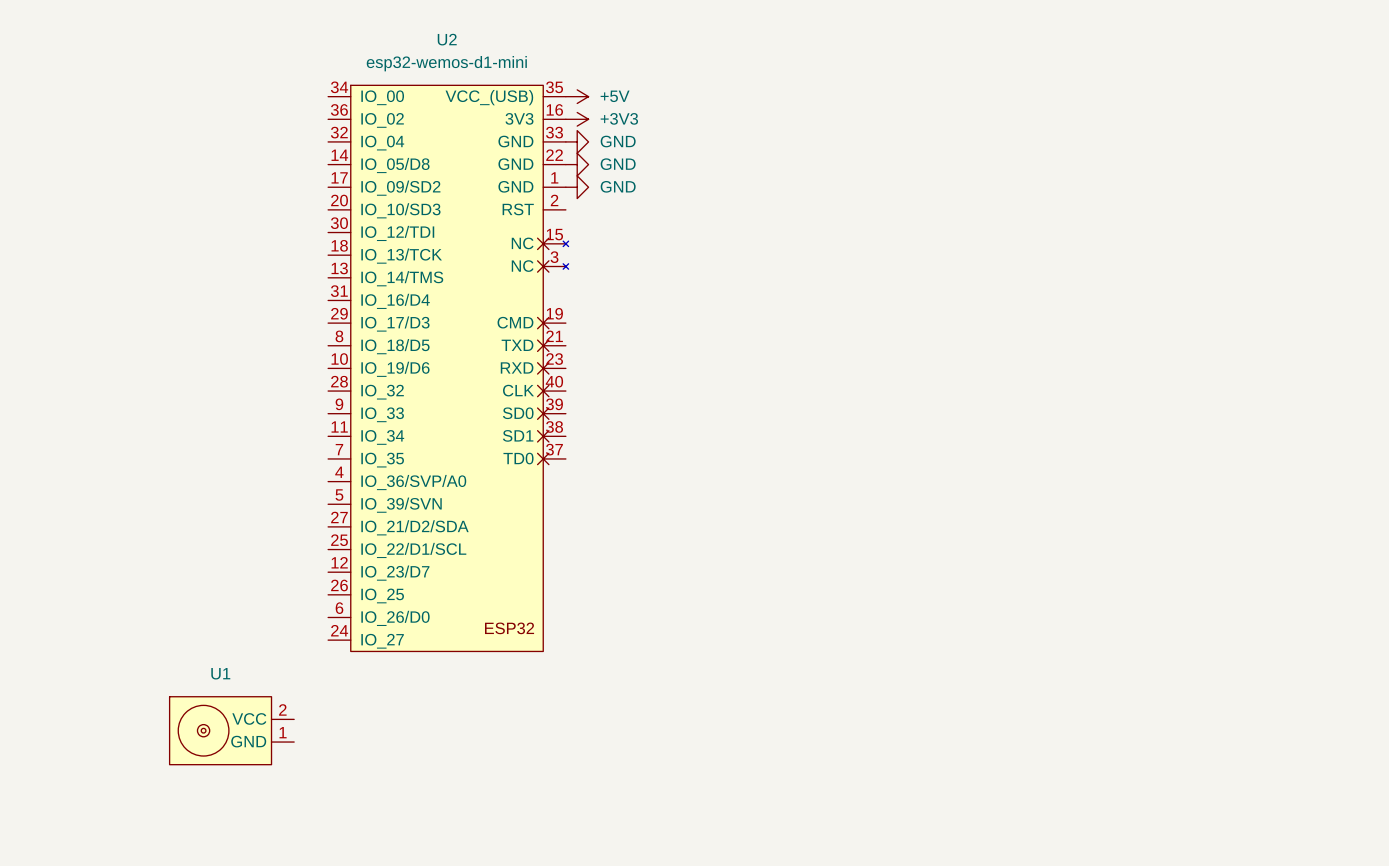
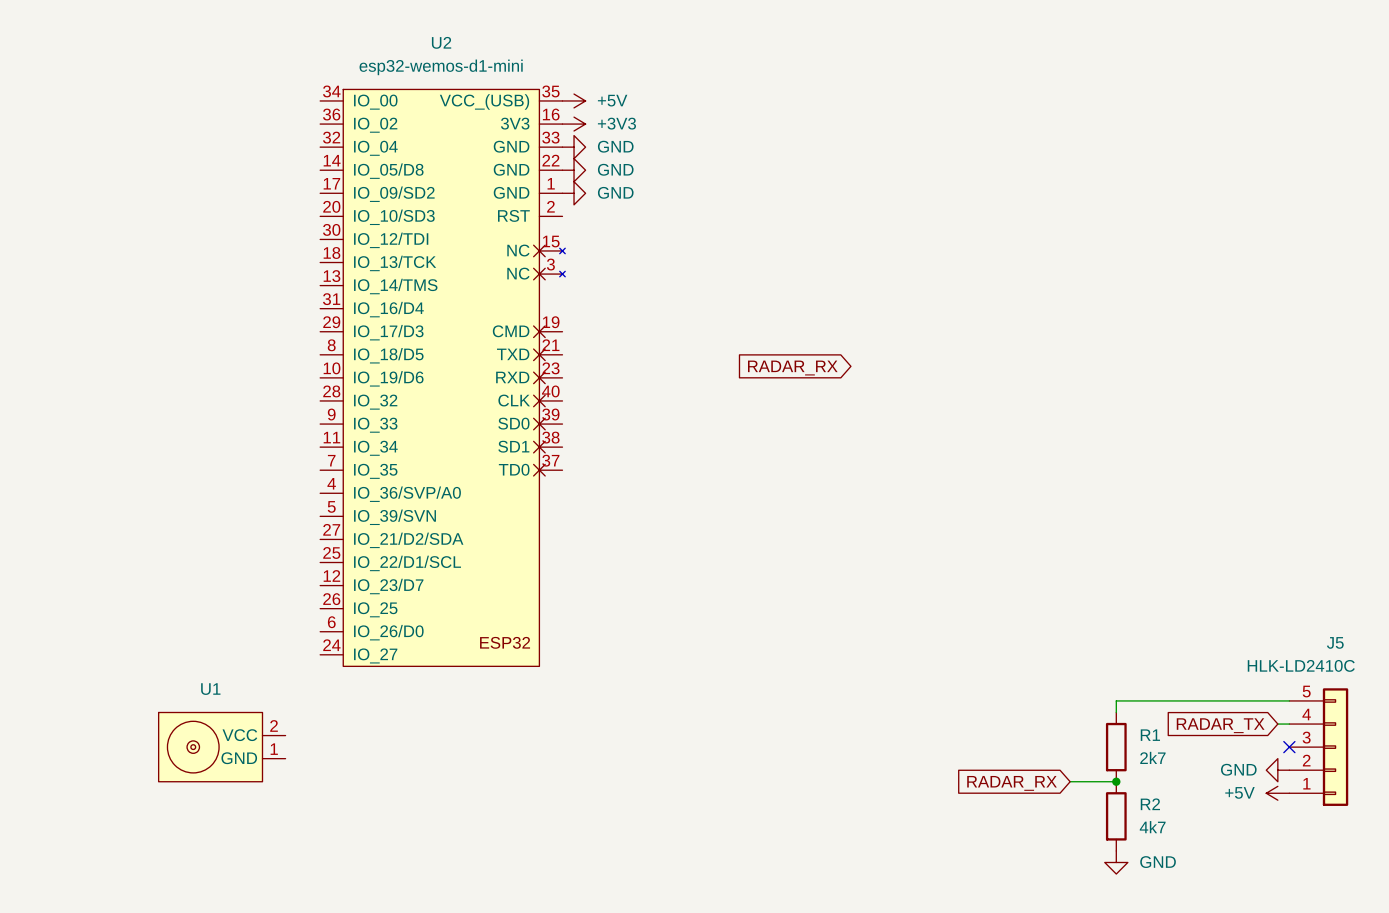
global label: none -> RADAR_RX (792, 368)
wire: none -> (1289, 700) (1116, 700) (1116, 712)
wire: none -> (1277, 724) (1289, 724)
global label: none -> RADAR_TX (1220, 725)
R1: none -> 2k7 (1116, 747)
no-connect mark: none -> (1289, 747)
J5: none -> HLK-LD2410C (1318, 747)
power symbol: none -> GND (1277, 770)
wire: none -> (1070, 781) (1116, 781)
junction: none -> (1116, 781)
global label: none -> RADAR_RX (1012, 783)
power symbol: none -> +5V (1277, 793)
R2: none -> 4k7 (1116, 816)
power symbol: none -> GND (1116, 862)

